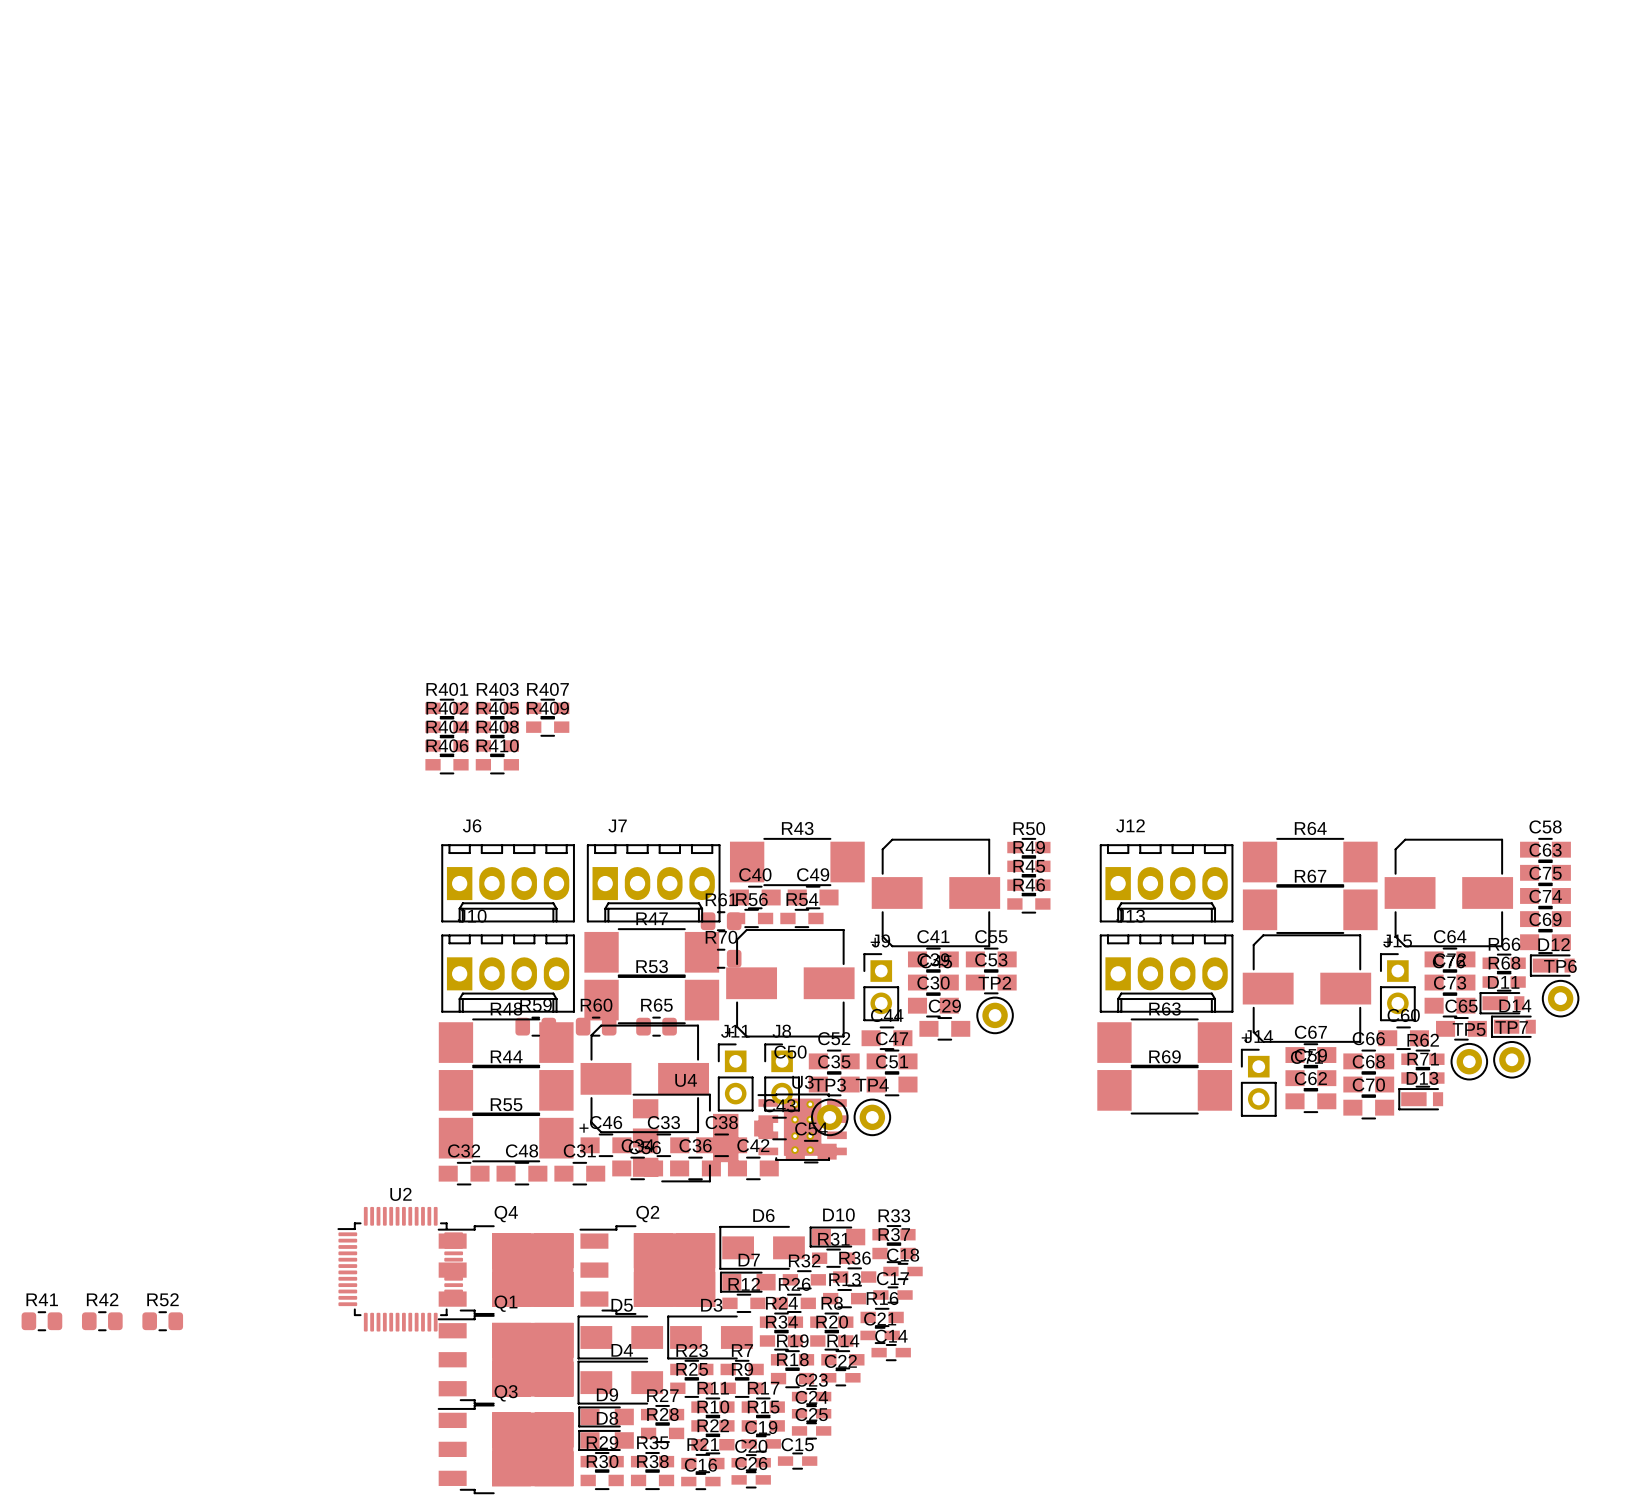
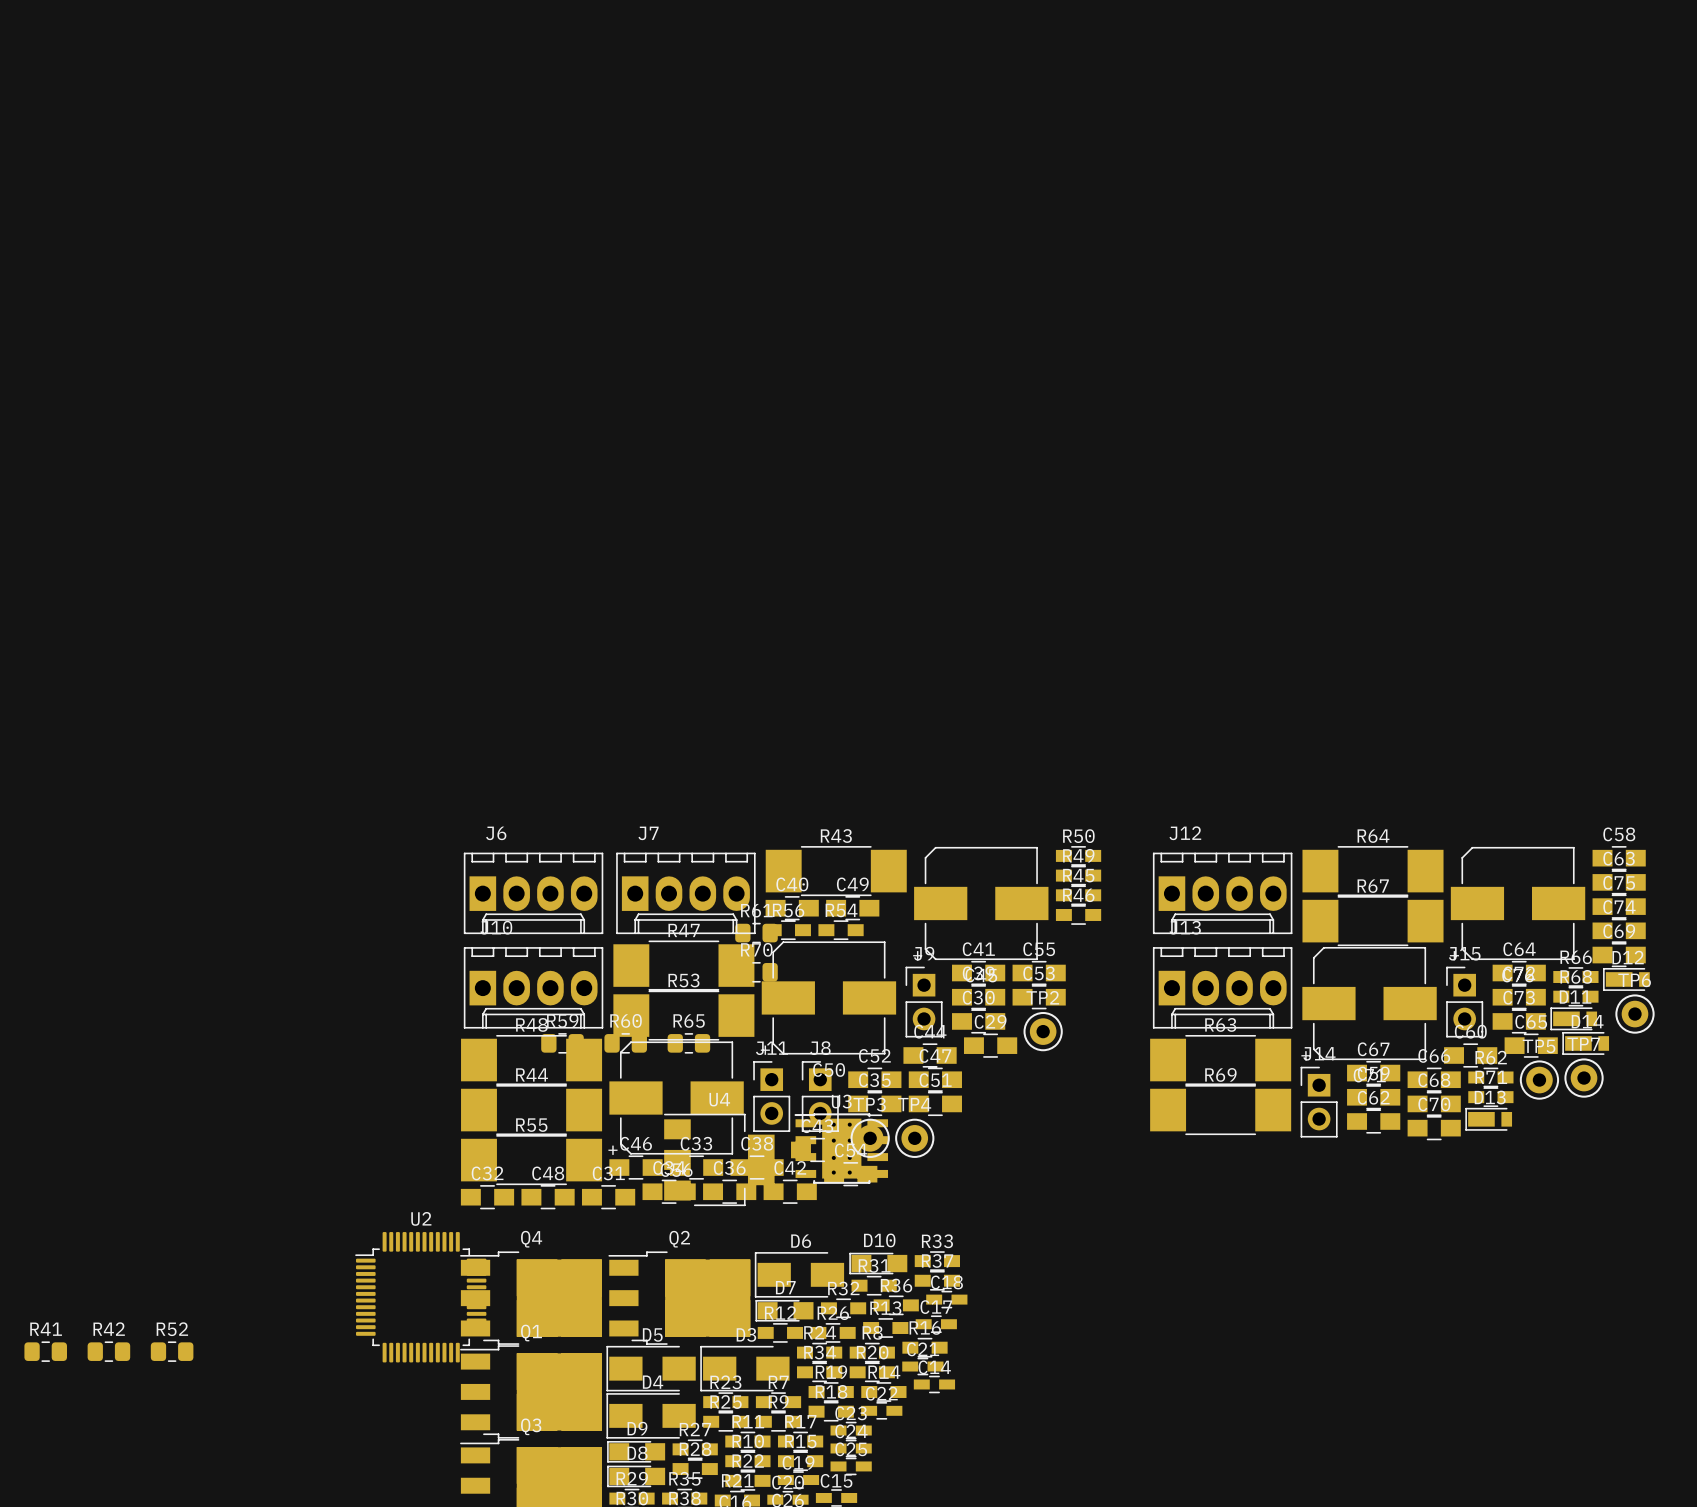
R401: (447, 708) -> none
R403: (497, 708) -> none
R407: (547, 708) -> none
R402: (447, 727) -> none
R405: (497, 727) -> none
R409: (547, 727) -> none
R404: (447, 745) -> none
R408: (497, 745) -> none
R406: (447, 764) -> none
R410: (497, 764) -> none

